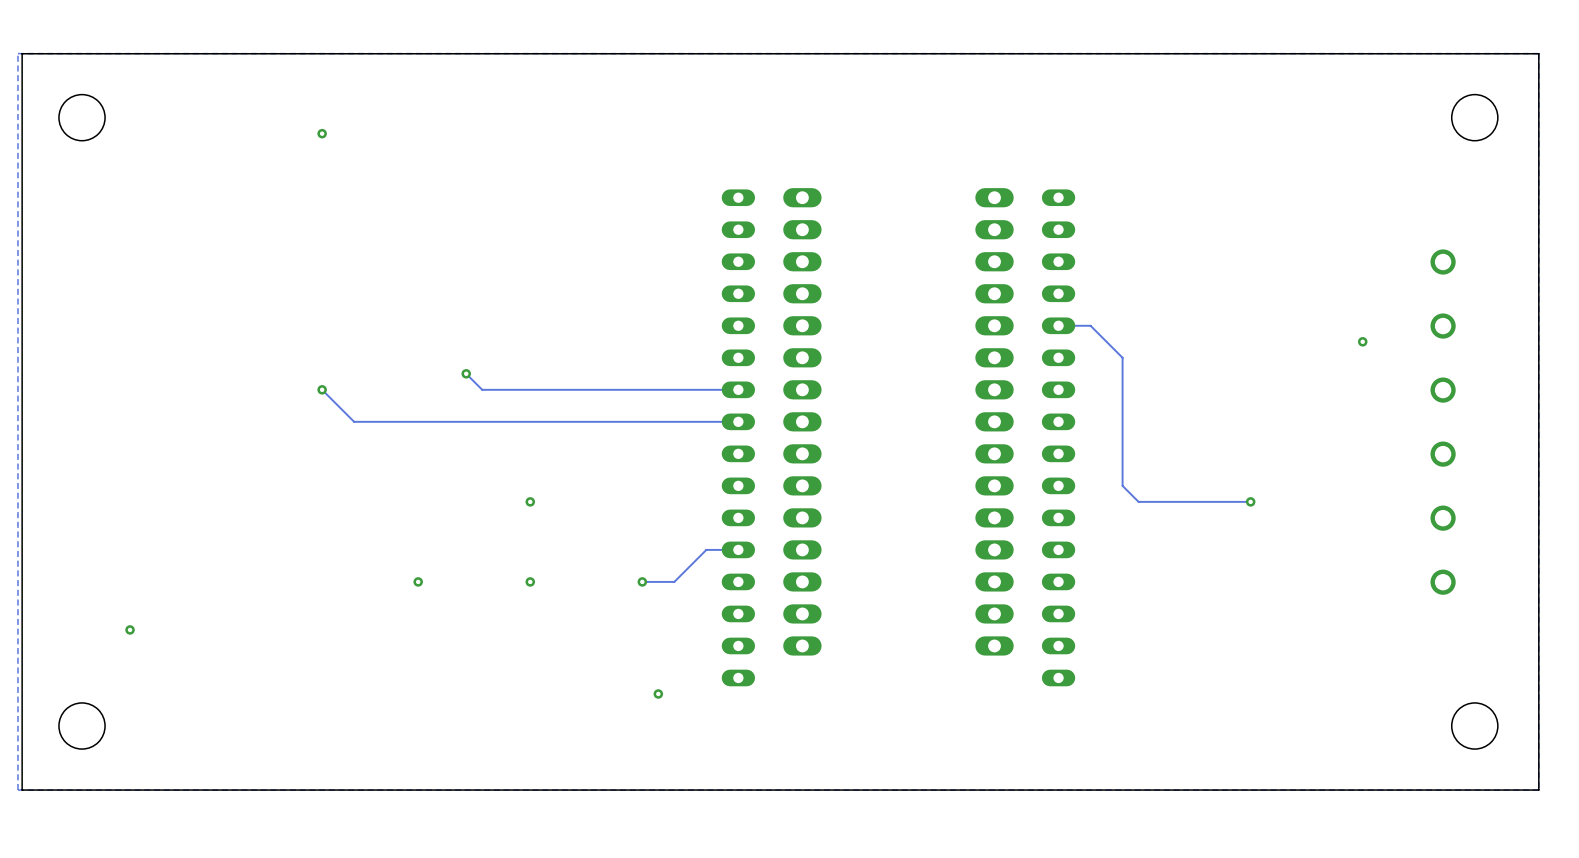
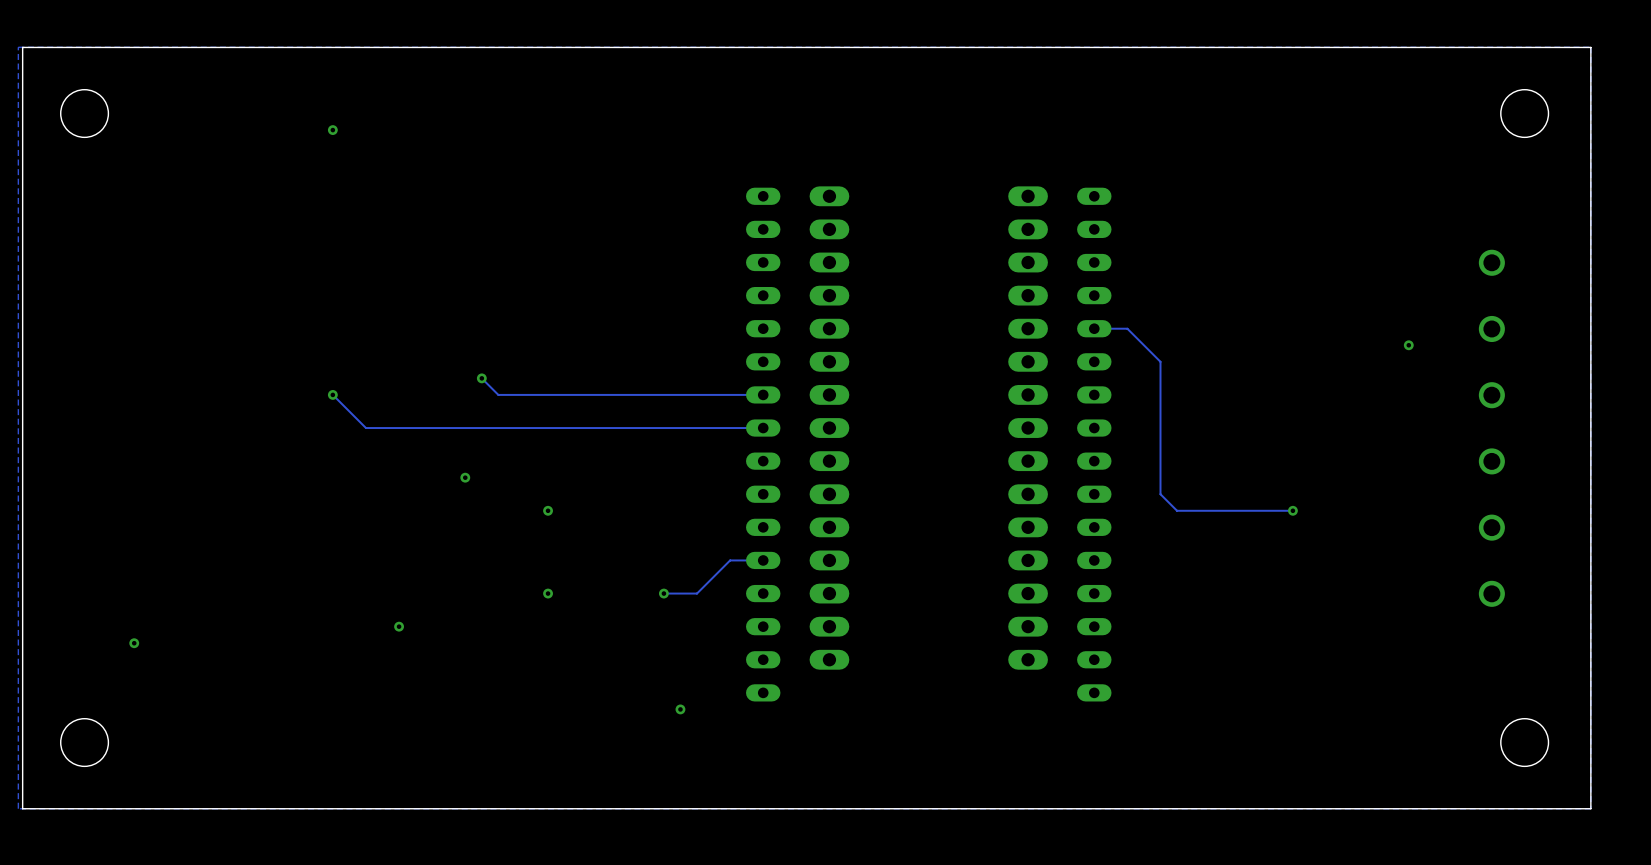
via: none -> (465, 477)
via position: (418, 581) -> (399, 626)

